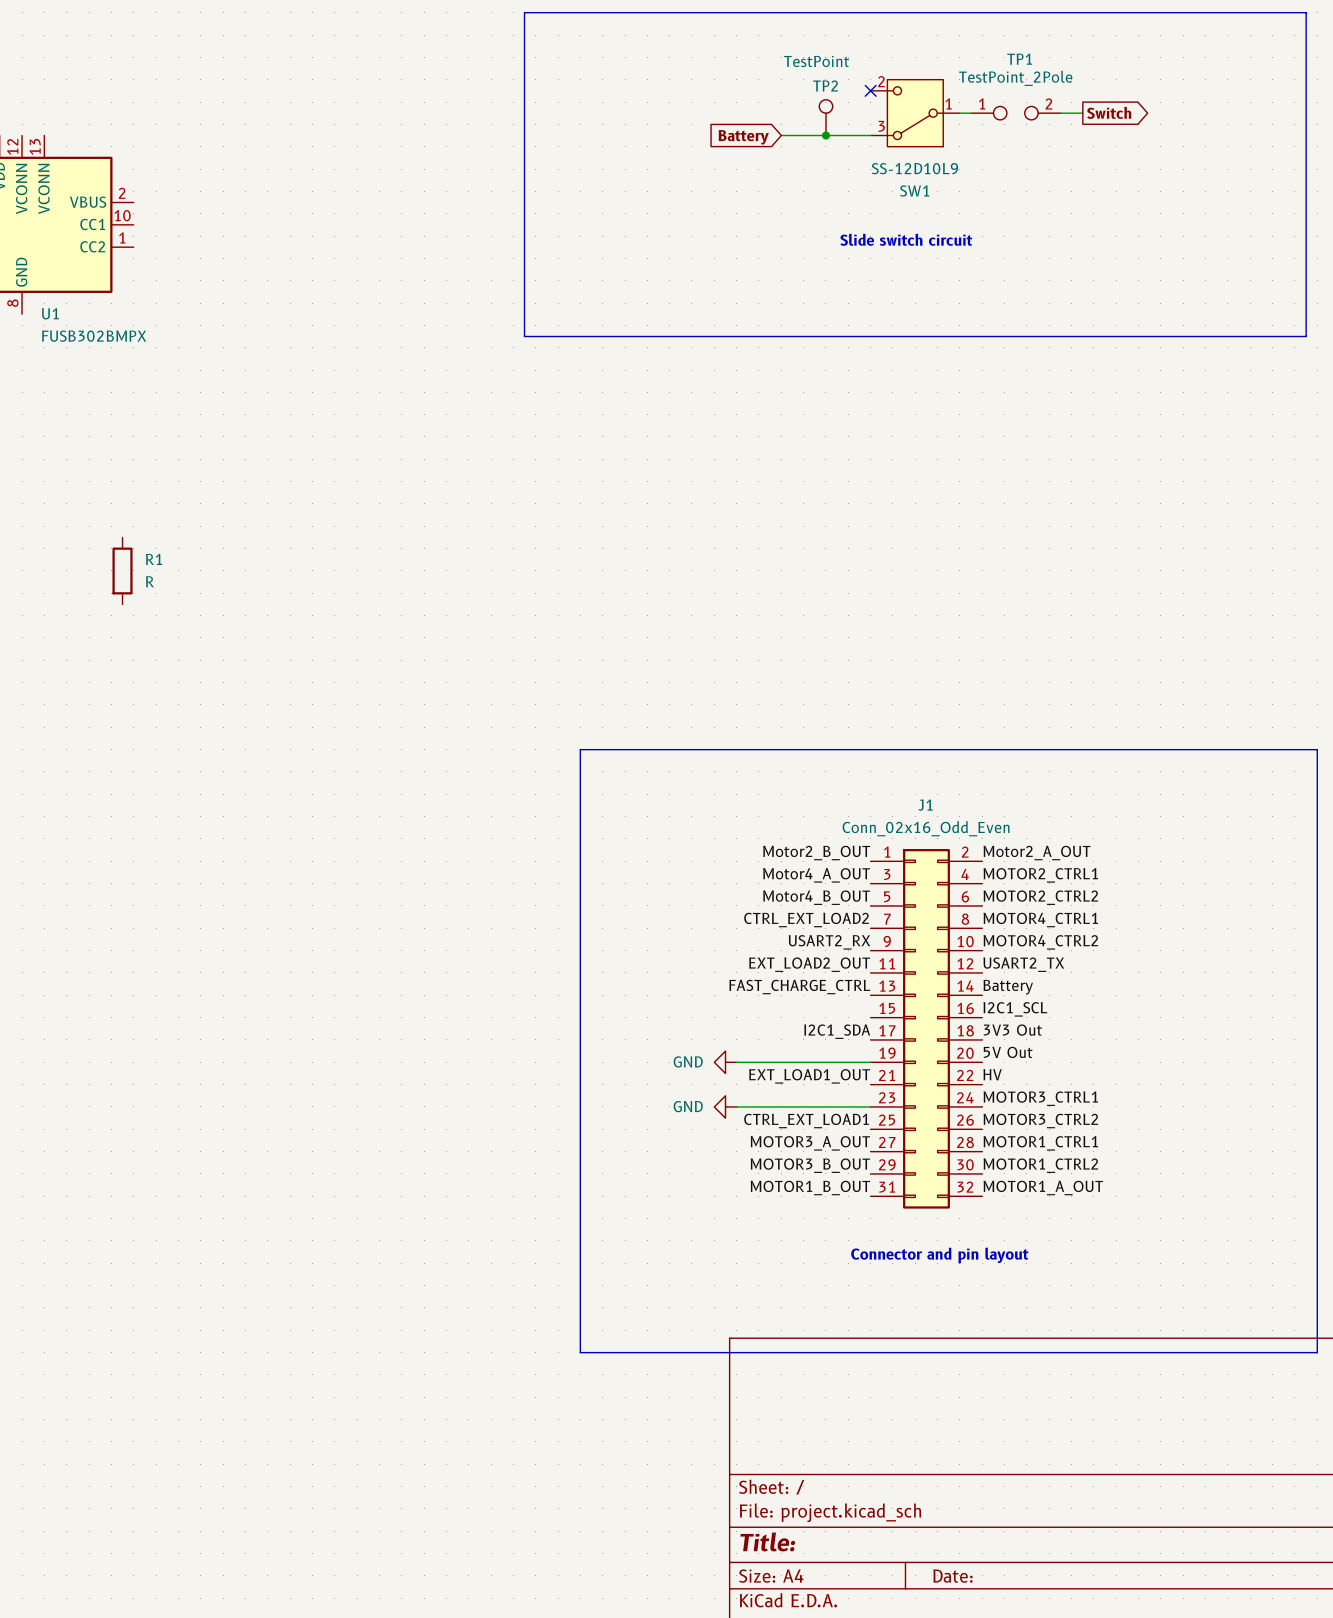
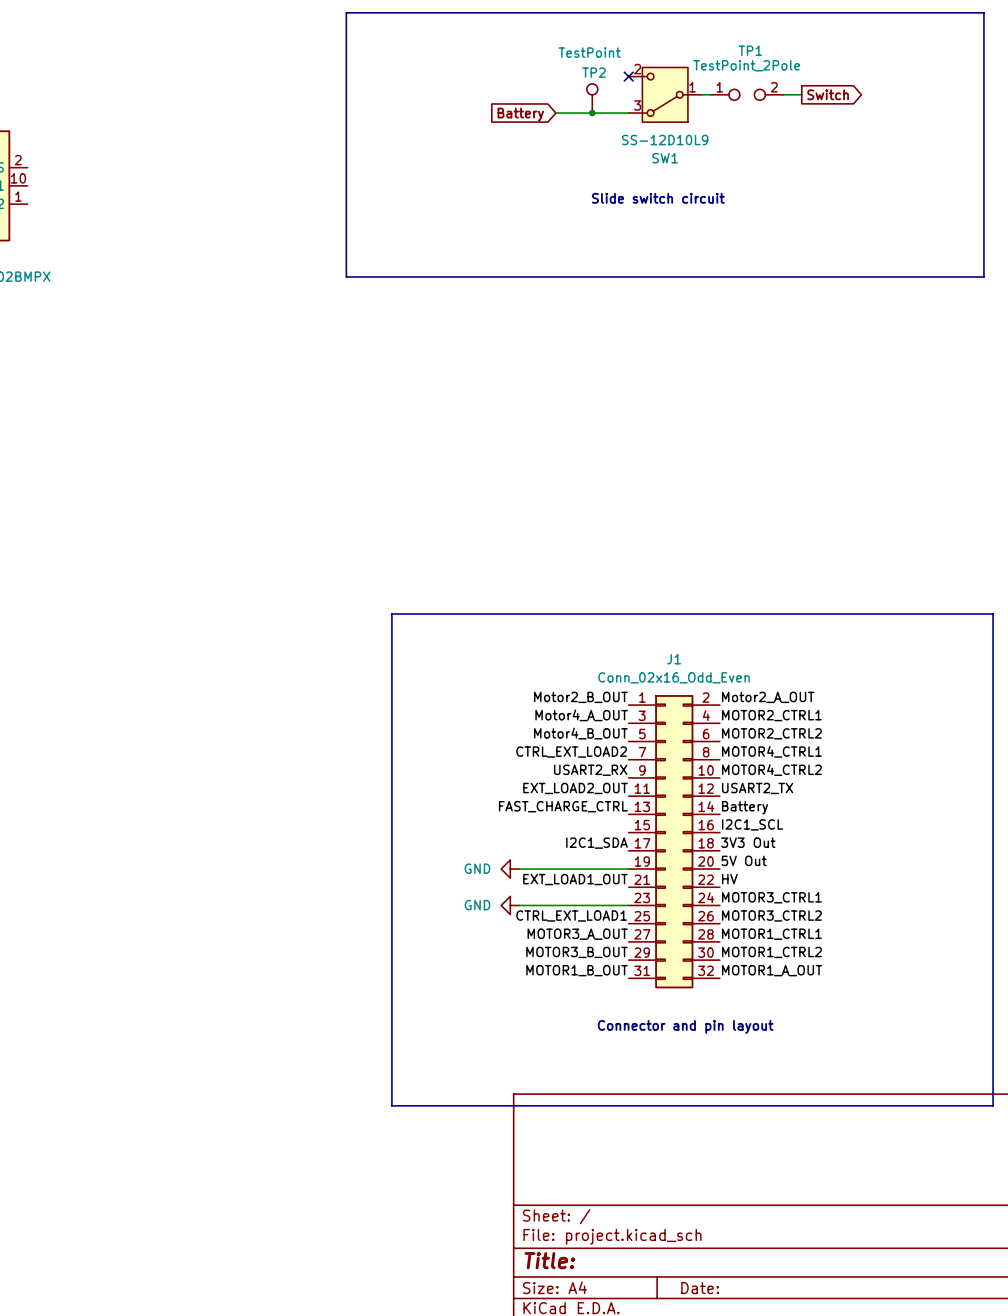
R1: R (122, 570) -> none

